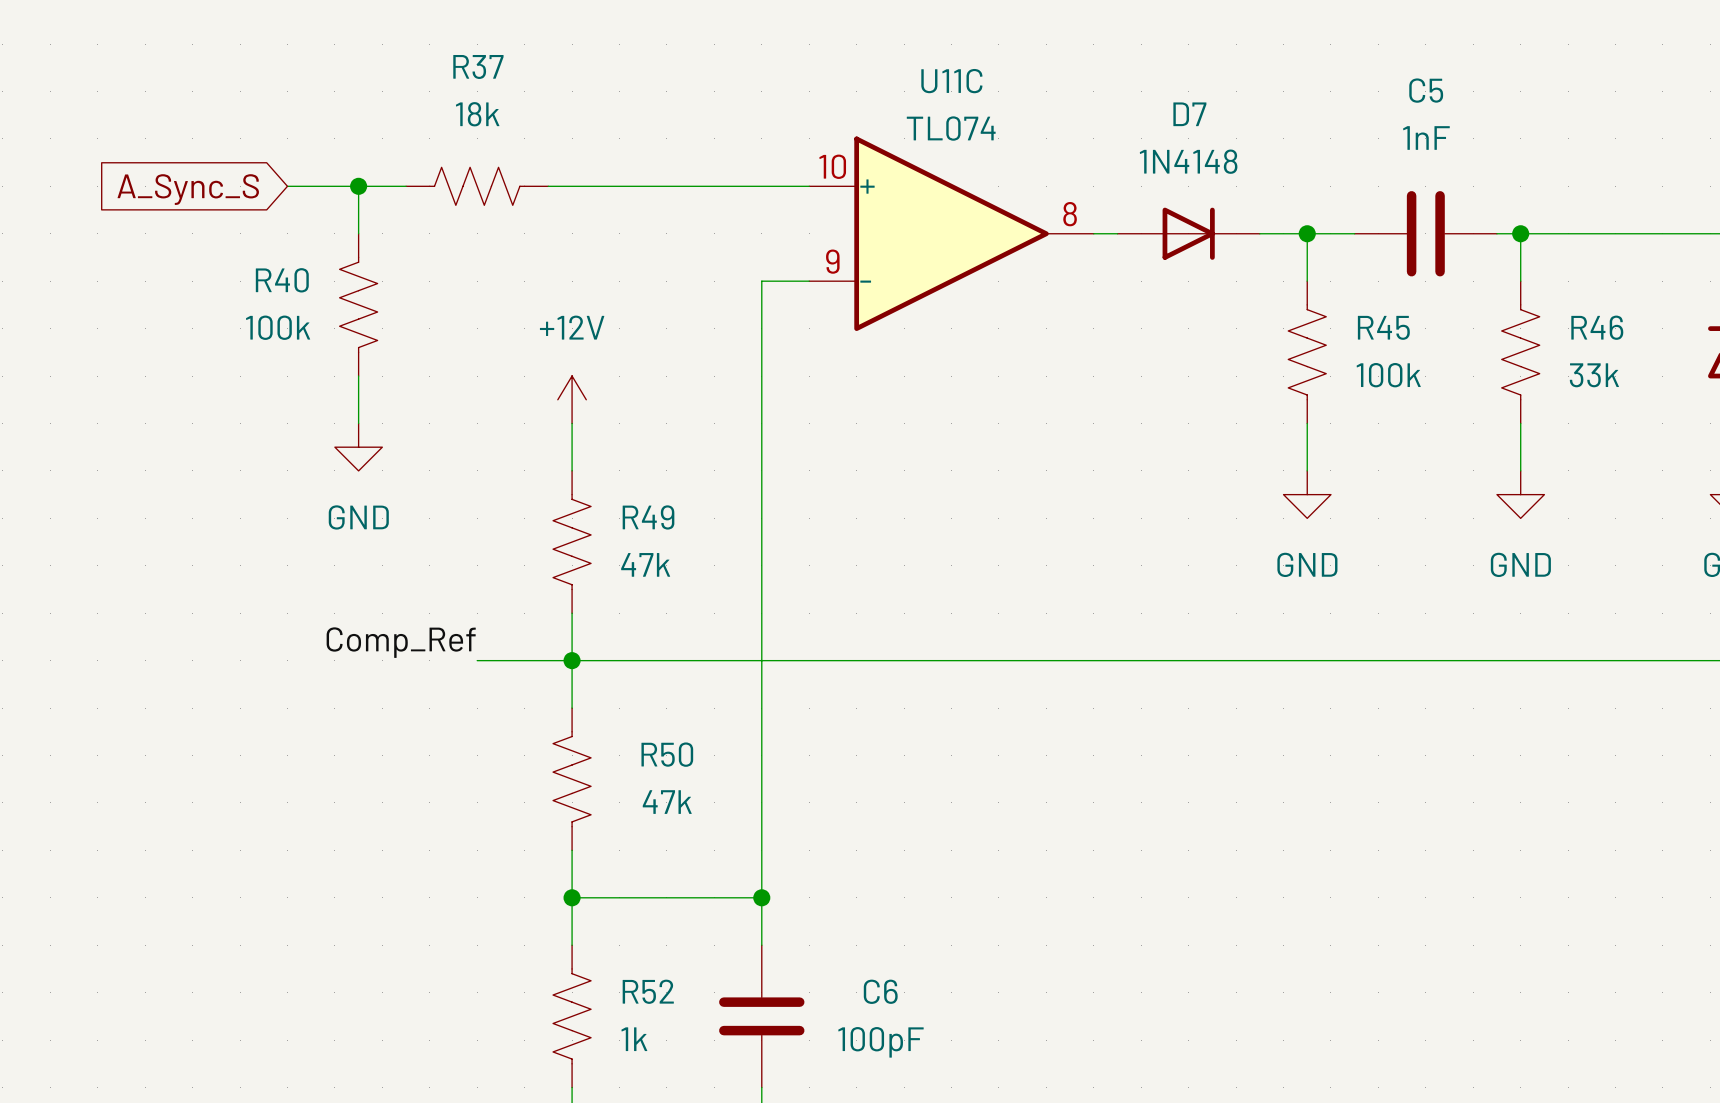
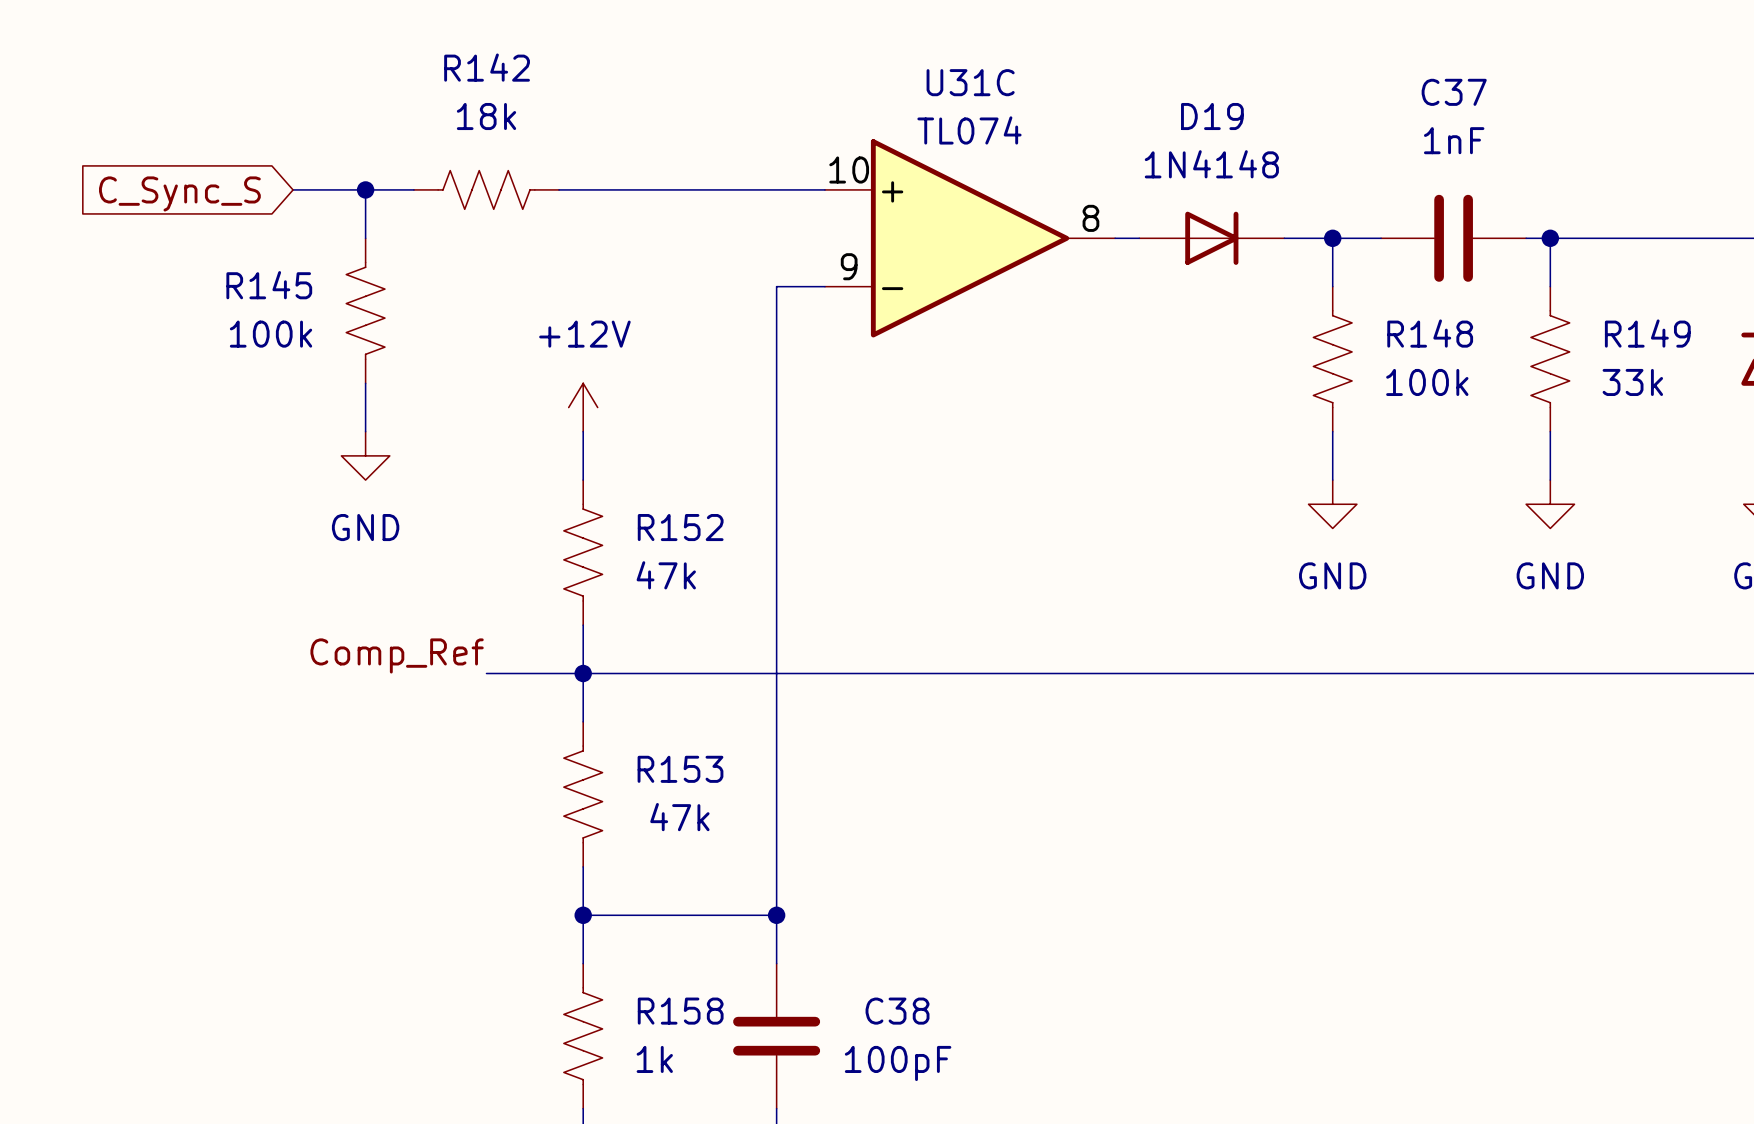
R37 name: R37 (478, 66) -> R142 (487, 67)
U11C name: U11C (951, 81) -> U31C (970, 82)
C5 name: C5 (1426, 90) -> C37 (1454, 92)
D7 name: D7 (1189, 114) -> D19 (1212, 116)
global label: A_Sync_S (188, 189) -> C_Sync_S (179, 193)
R40 name: R40 (282, 280) -> R145 (269, 285)
R45 name: R45 (1383, 327) -> R148 (1430, 333)
R46 name: R46 (1597, 327) -> R149 (1647, 333)
R49 name: R49 (648, 517) -> R152 (680, 527)
R50 name: R50 (667, 754) -> R153 (680, 769)
R52 name: R52 (648, 991) -> R158 (680, 1011)
C6 name: C6 (880, 991) -> C38 (897, 1011)

